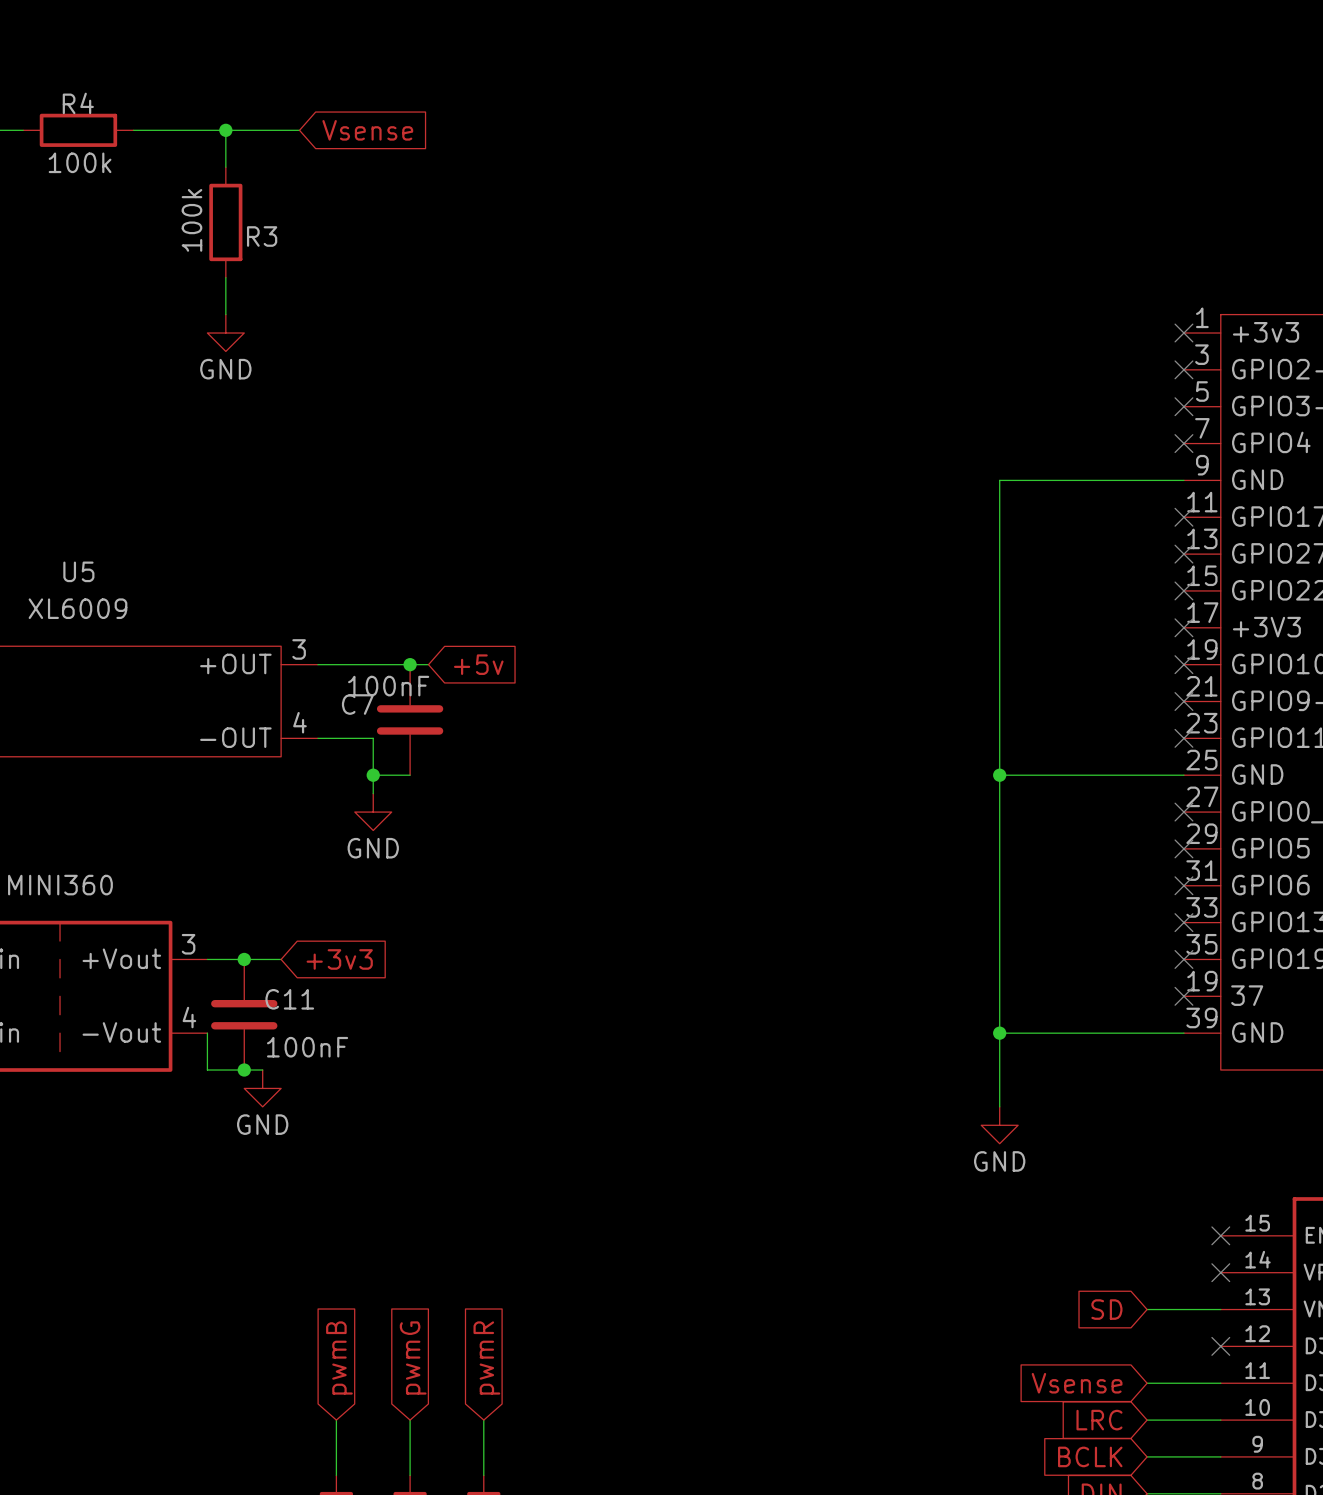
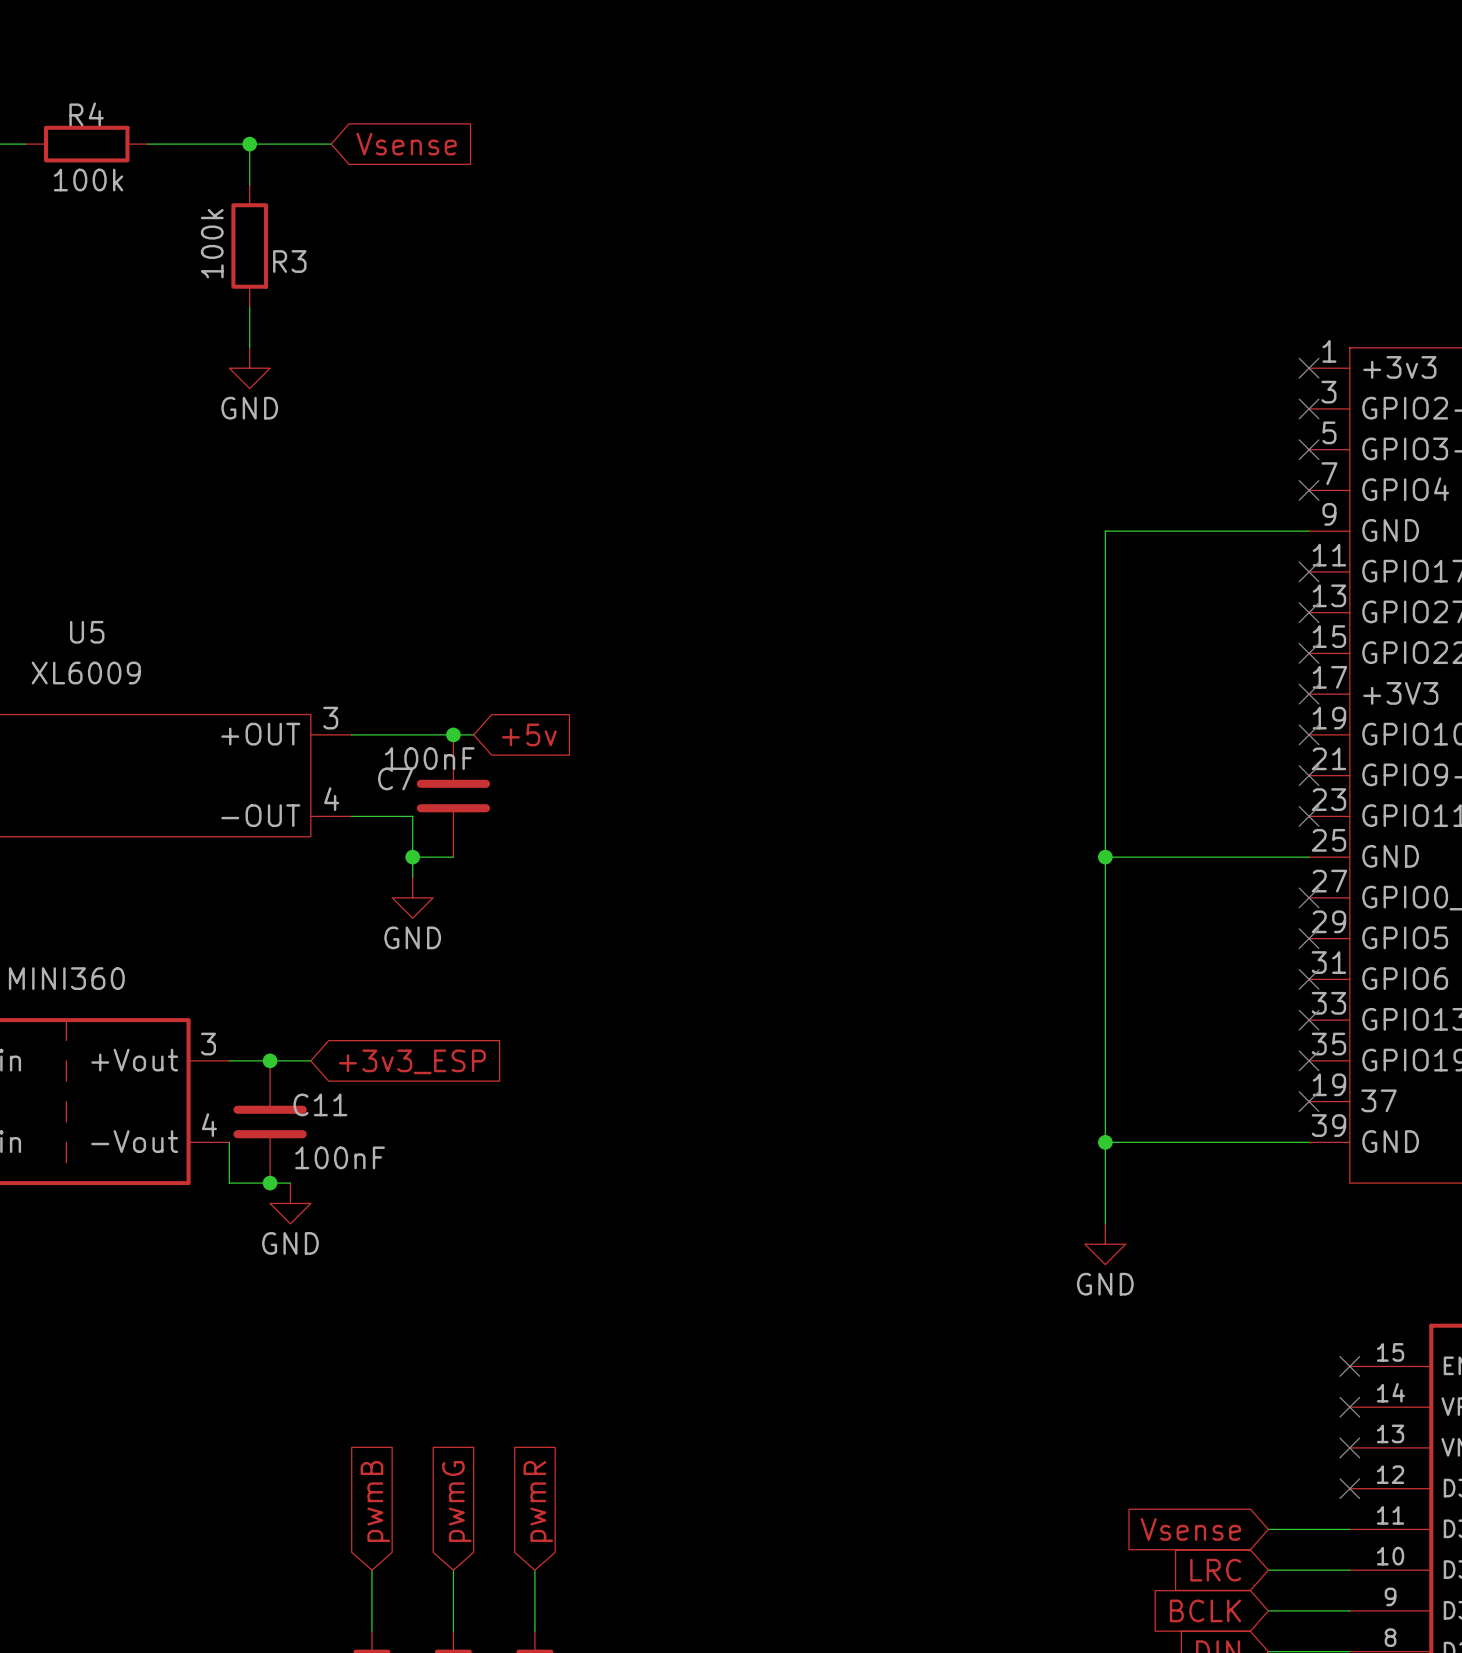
global label: +3v3 (339, 959) -> +3v3_ESP (412, 1061)
global label: SD (1106, 1309) -> none
wire: (1147, 1309) (1220, 1309) -> none
no-connect mark: none -> (1349, 1447)

